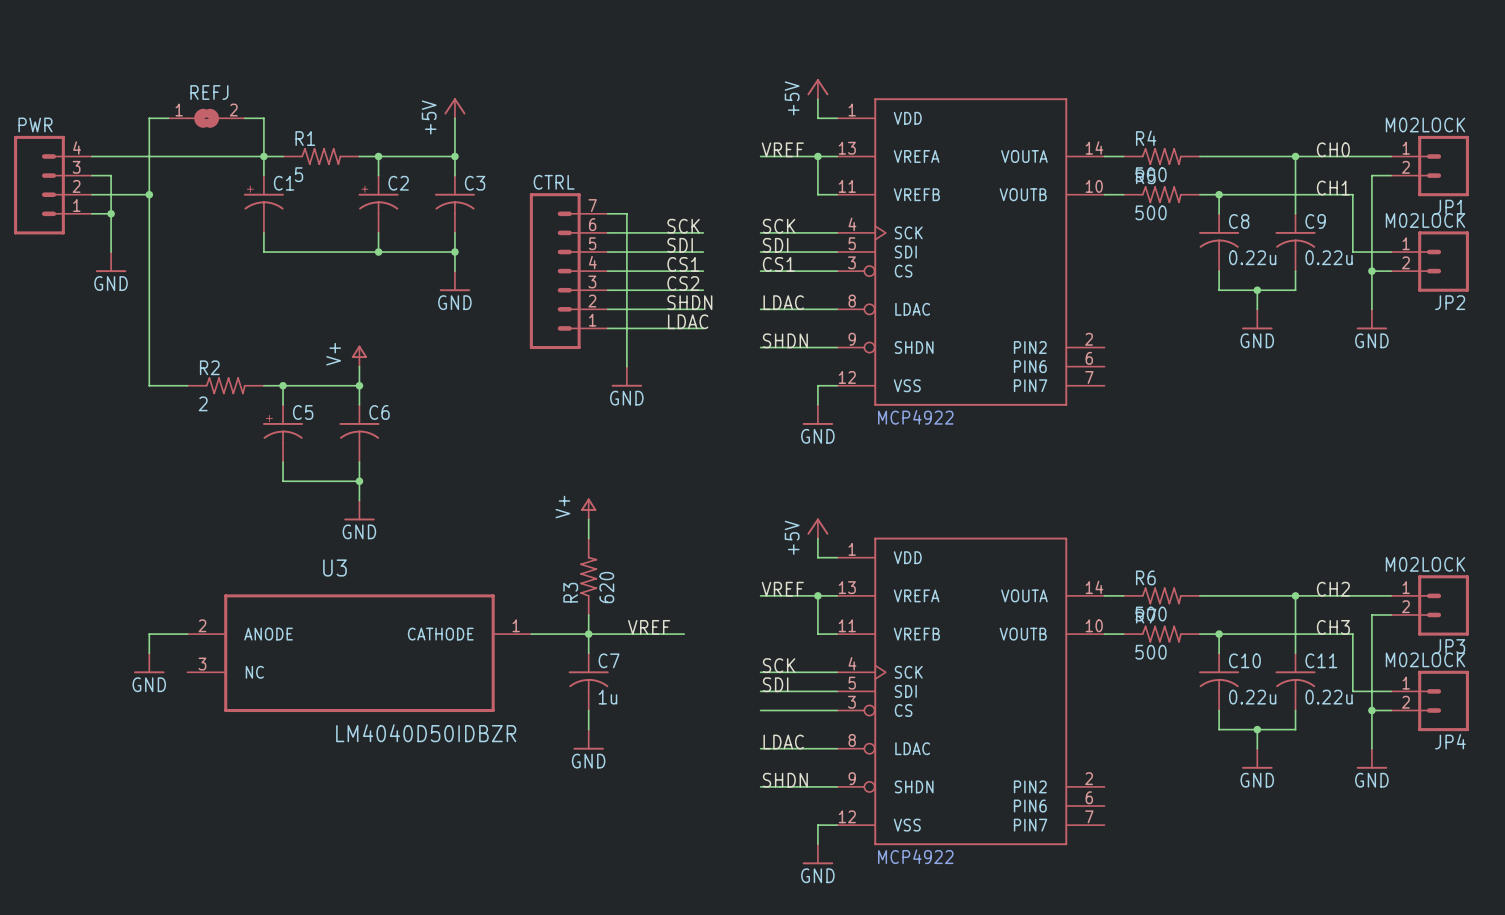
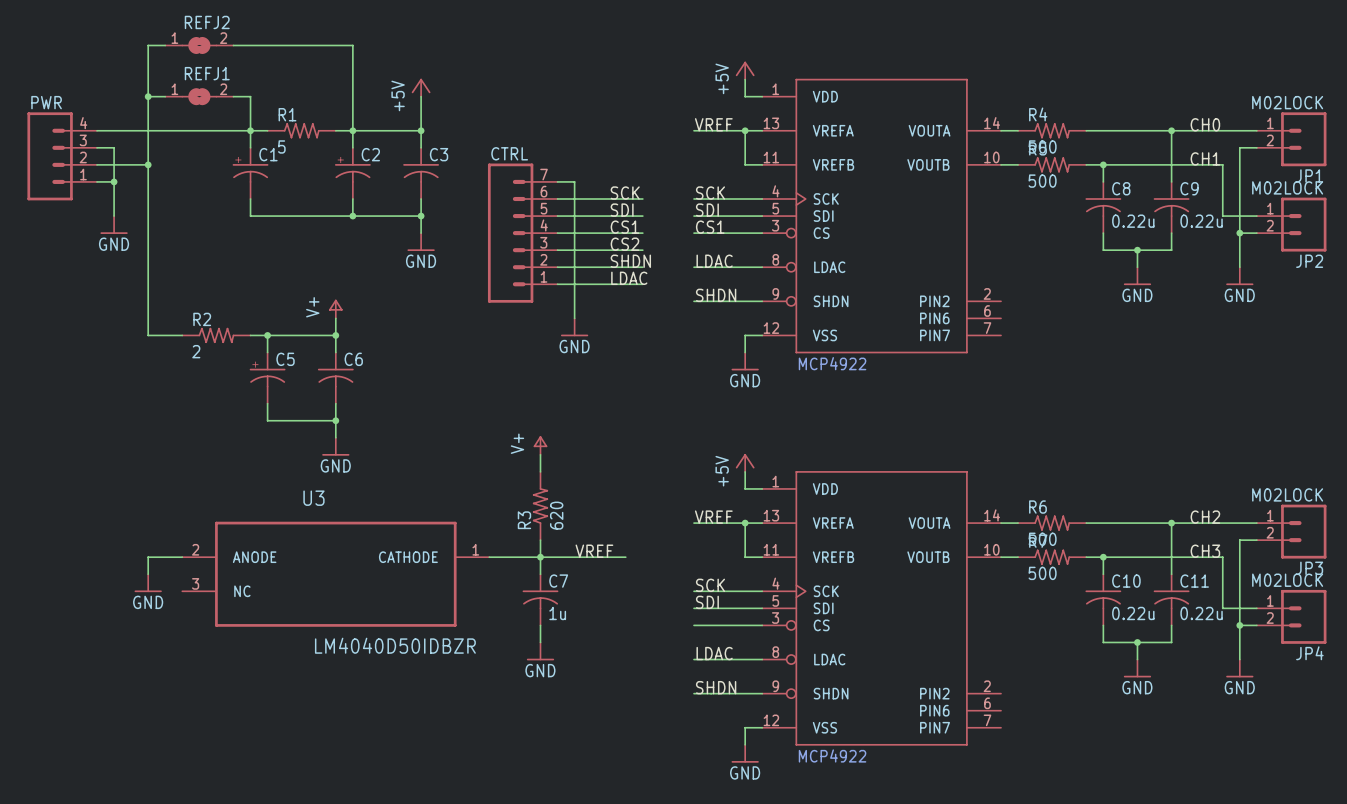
wire: none -> (165, 45) (148, 45) (148, 96)
REFJ2: none -> (199, 45)
wire: none -> (233, 45) (352, 45) (352, 130)
REFJ name: REFJ (209, 92) -> REFJ1 (207, 73)
junction: none -> (148, 96)

